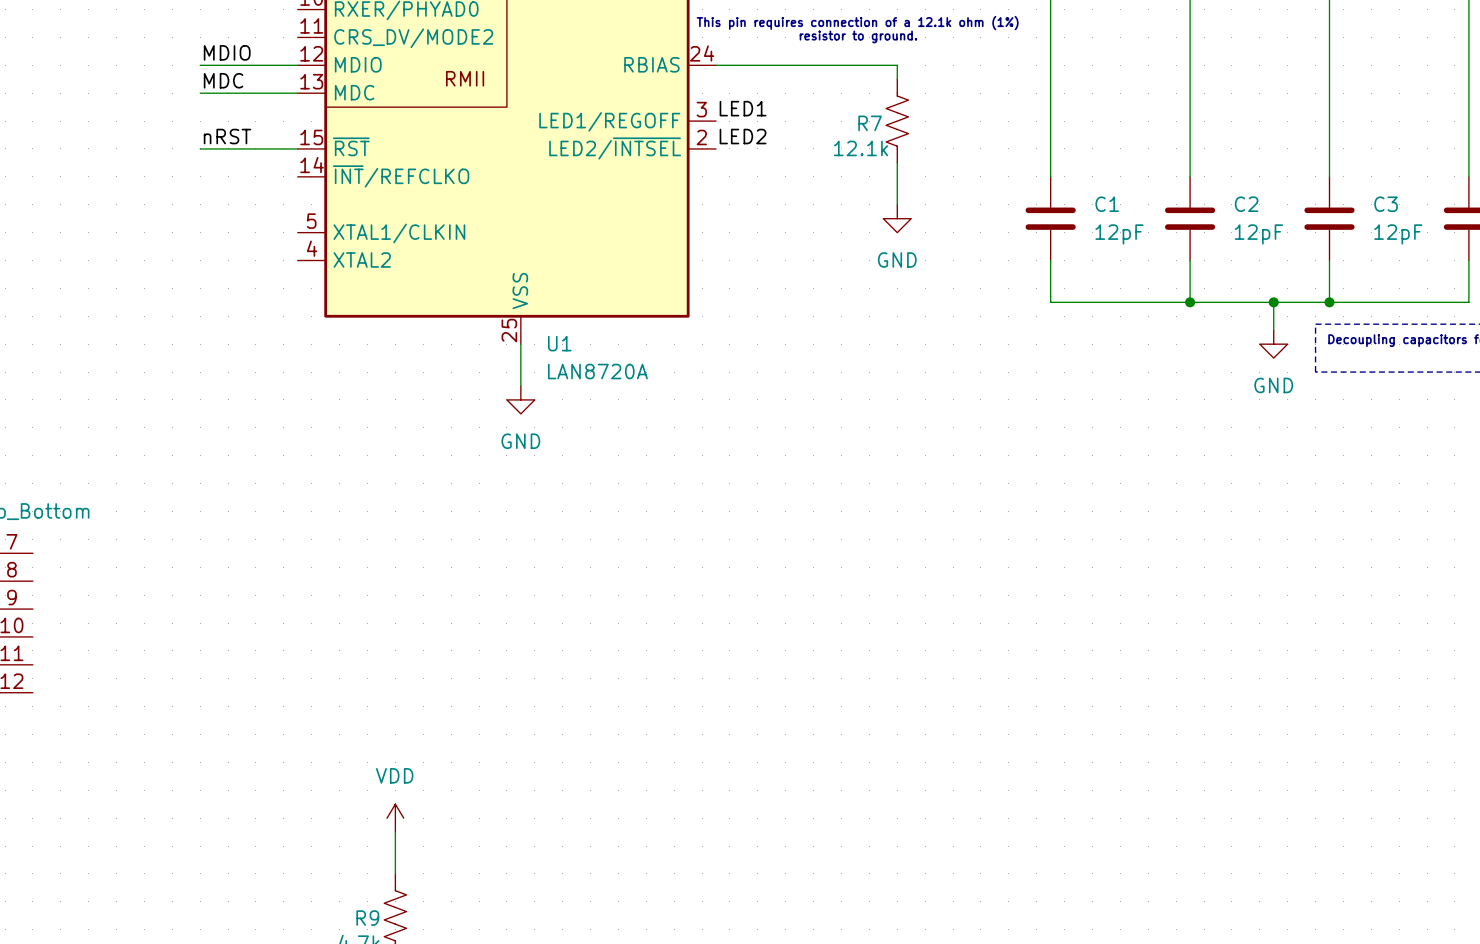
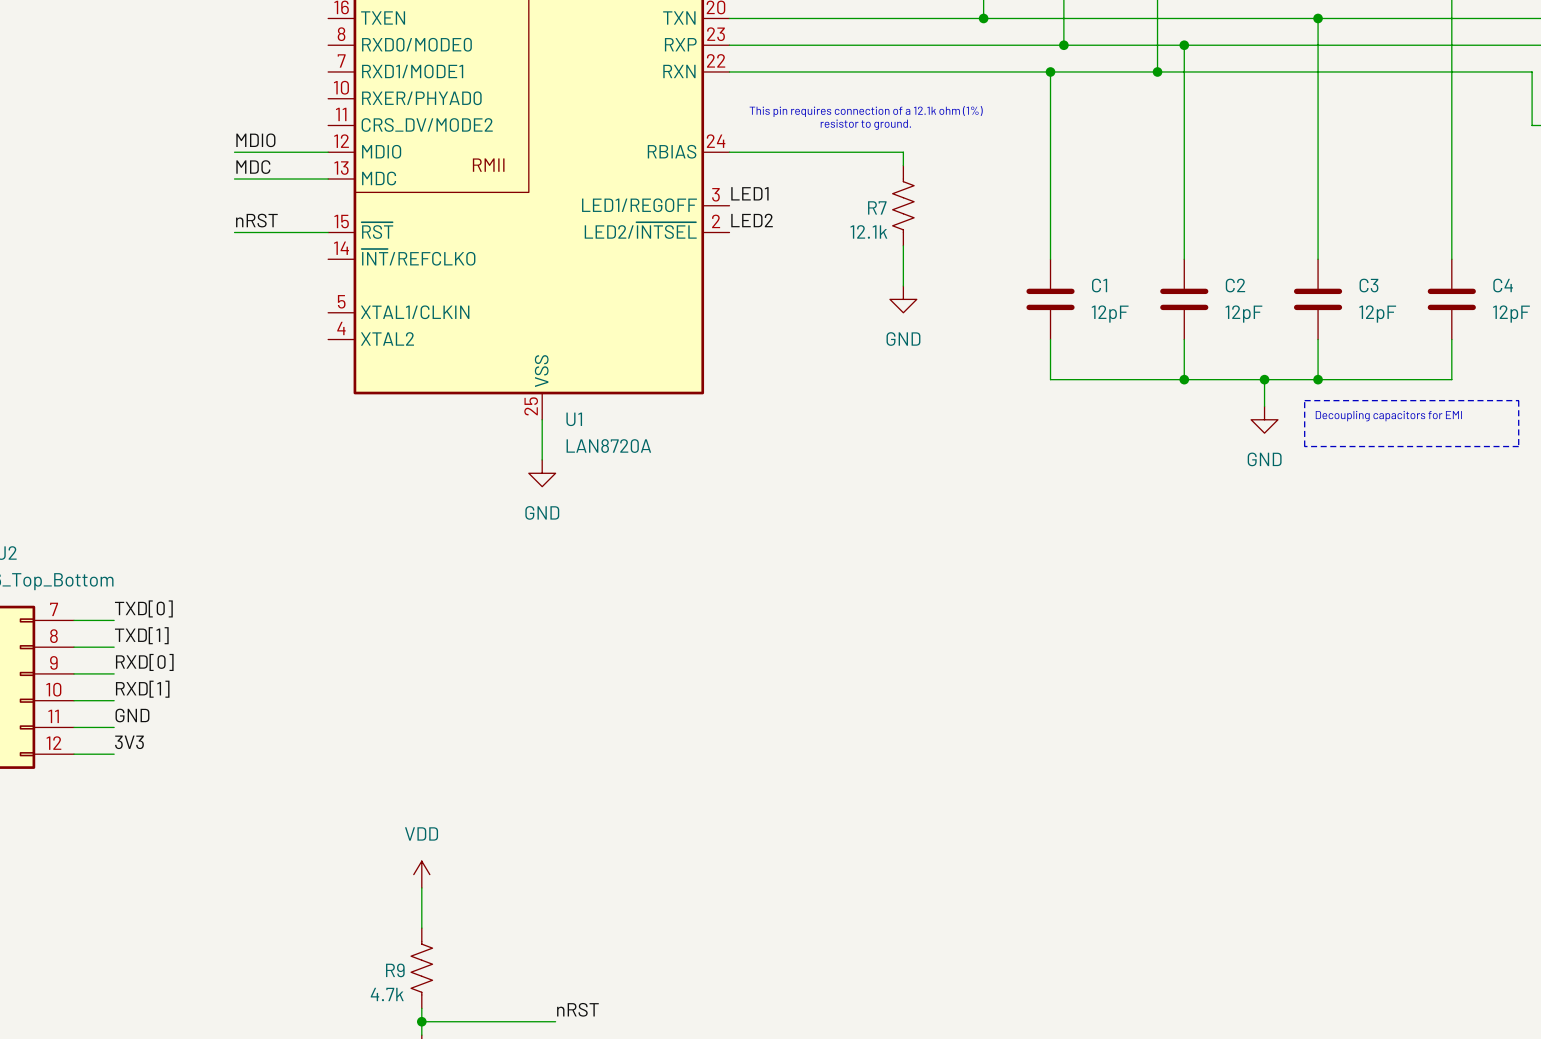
label: none -> TXD[0] (143, 608)
wire: none -> (74, 620) (114, 620)
label: none -> TXD[1] (141, 635)
wire: none -> (74, 647) (114, 647)
label: none -> RXD[0] (144, 662)
wire: none -> (74, 673) (114, 673)
label: none -> RXD[1] (142, 689)
wire: none -> (74, 700) (114, 700)
label: none -> GND (132, 715)
wire: none -> (74, 727) (114, 727)
label: none -> 3V3 (129, 742)
wire: none -> (74, 754) (114, 754)

